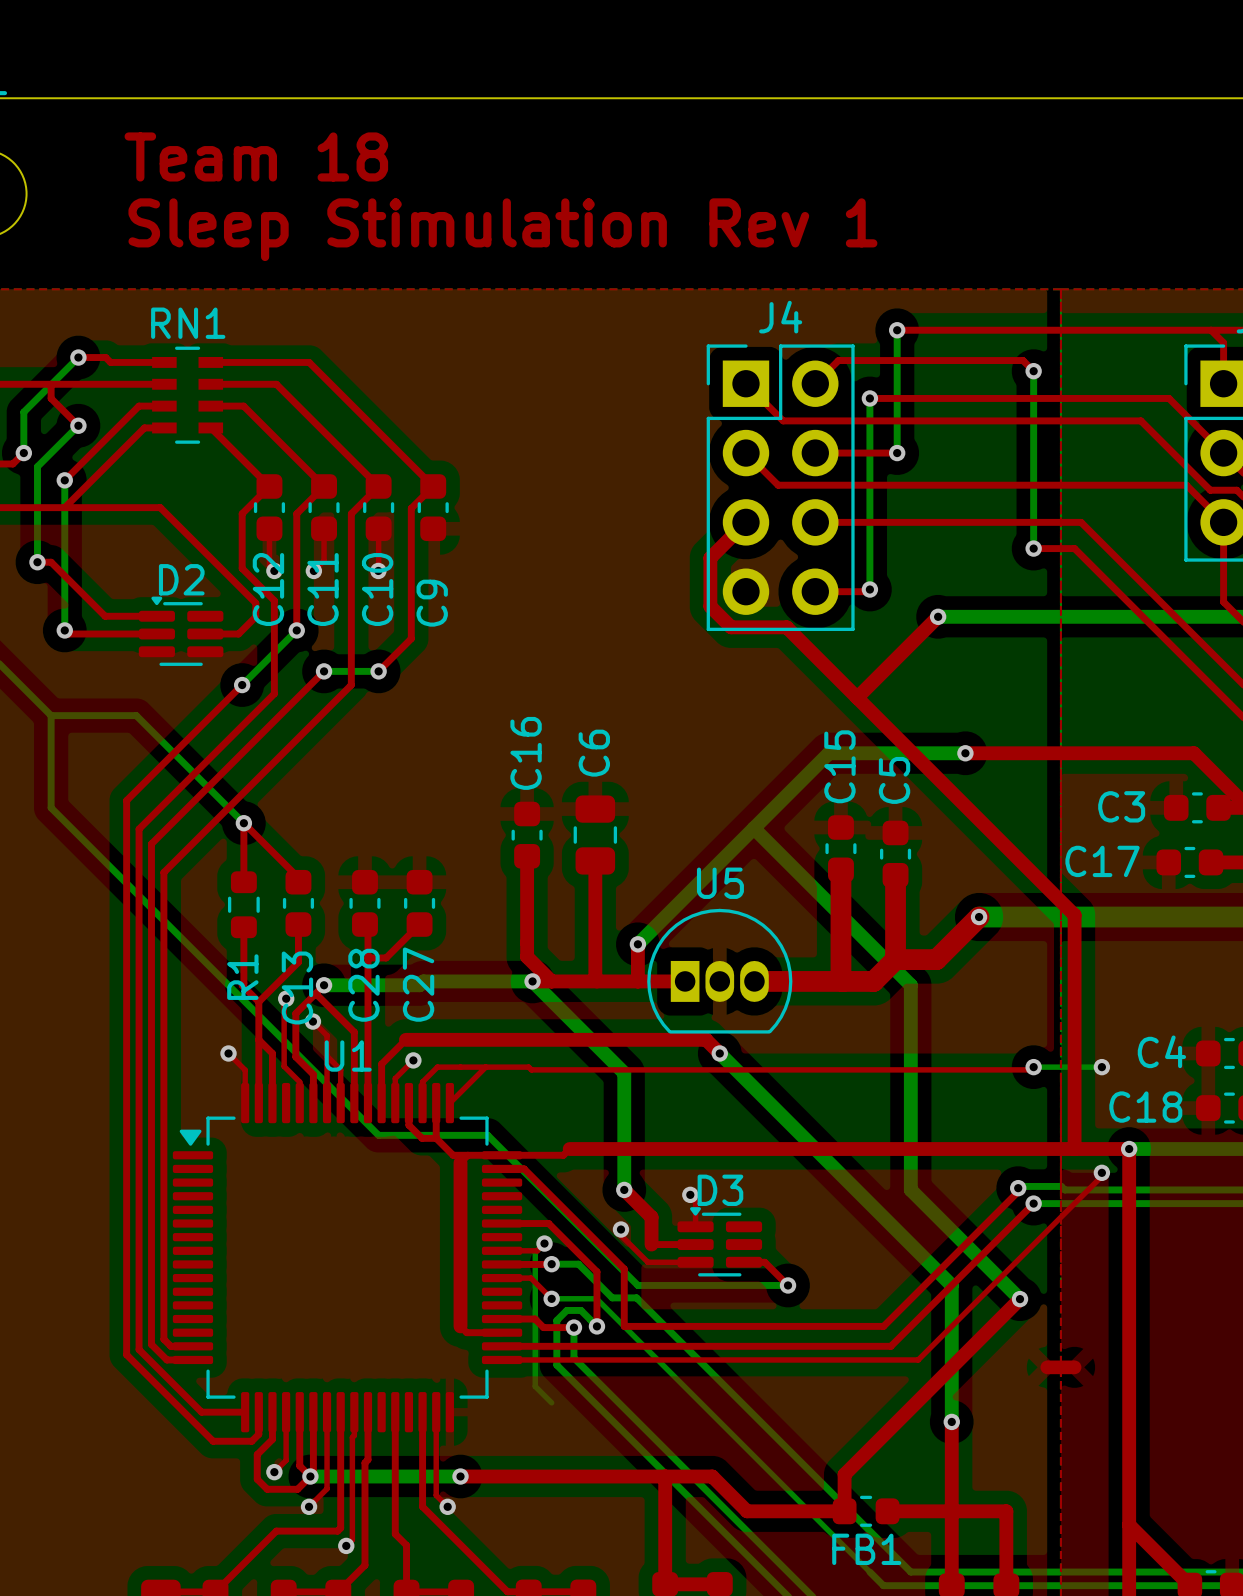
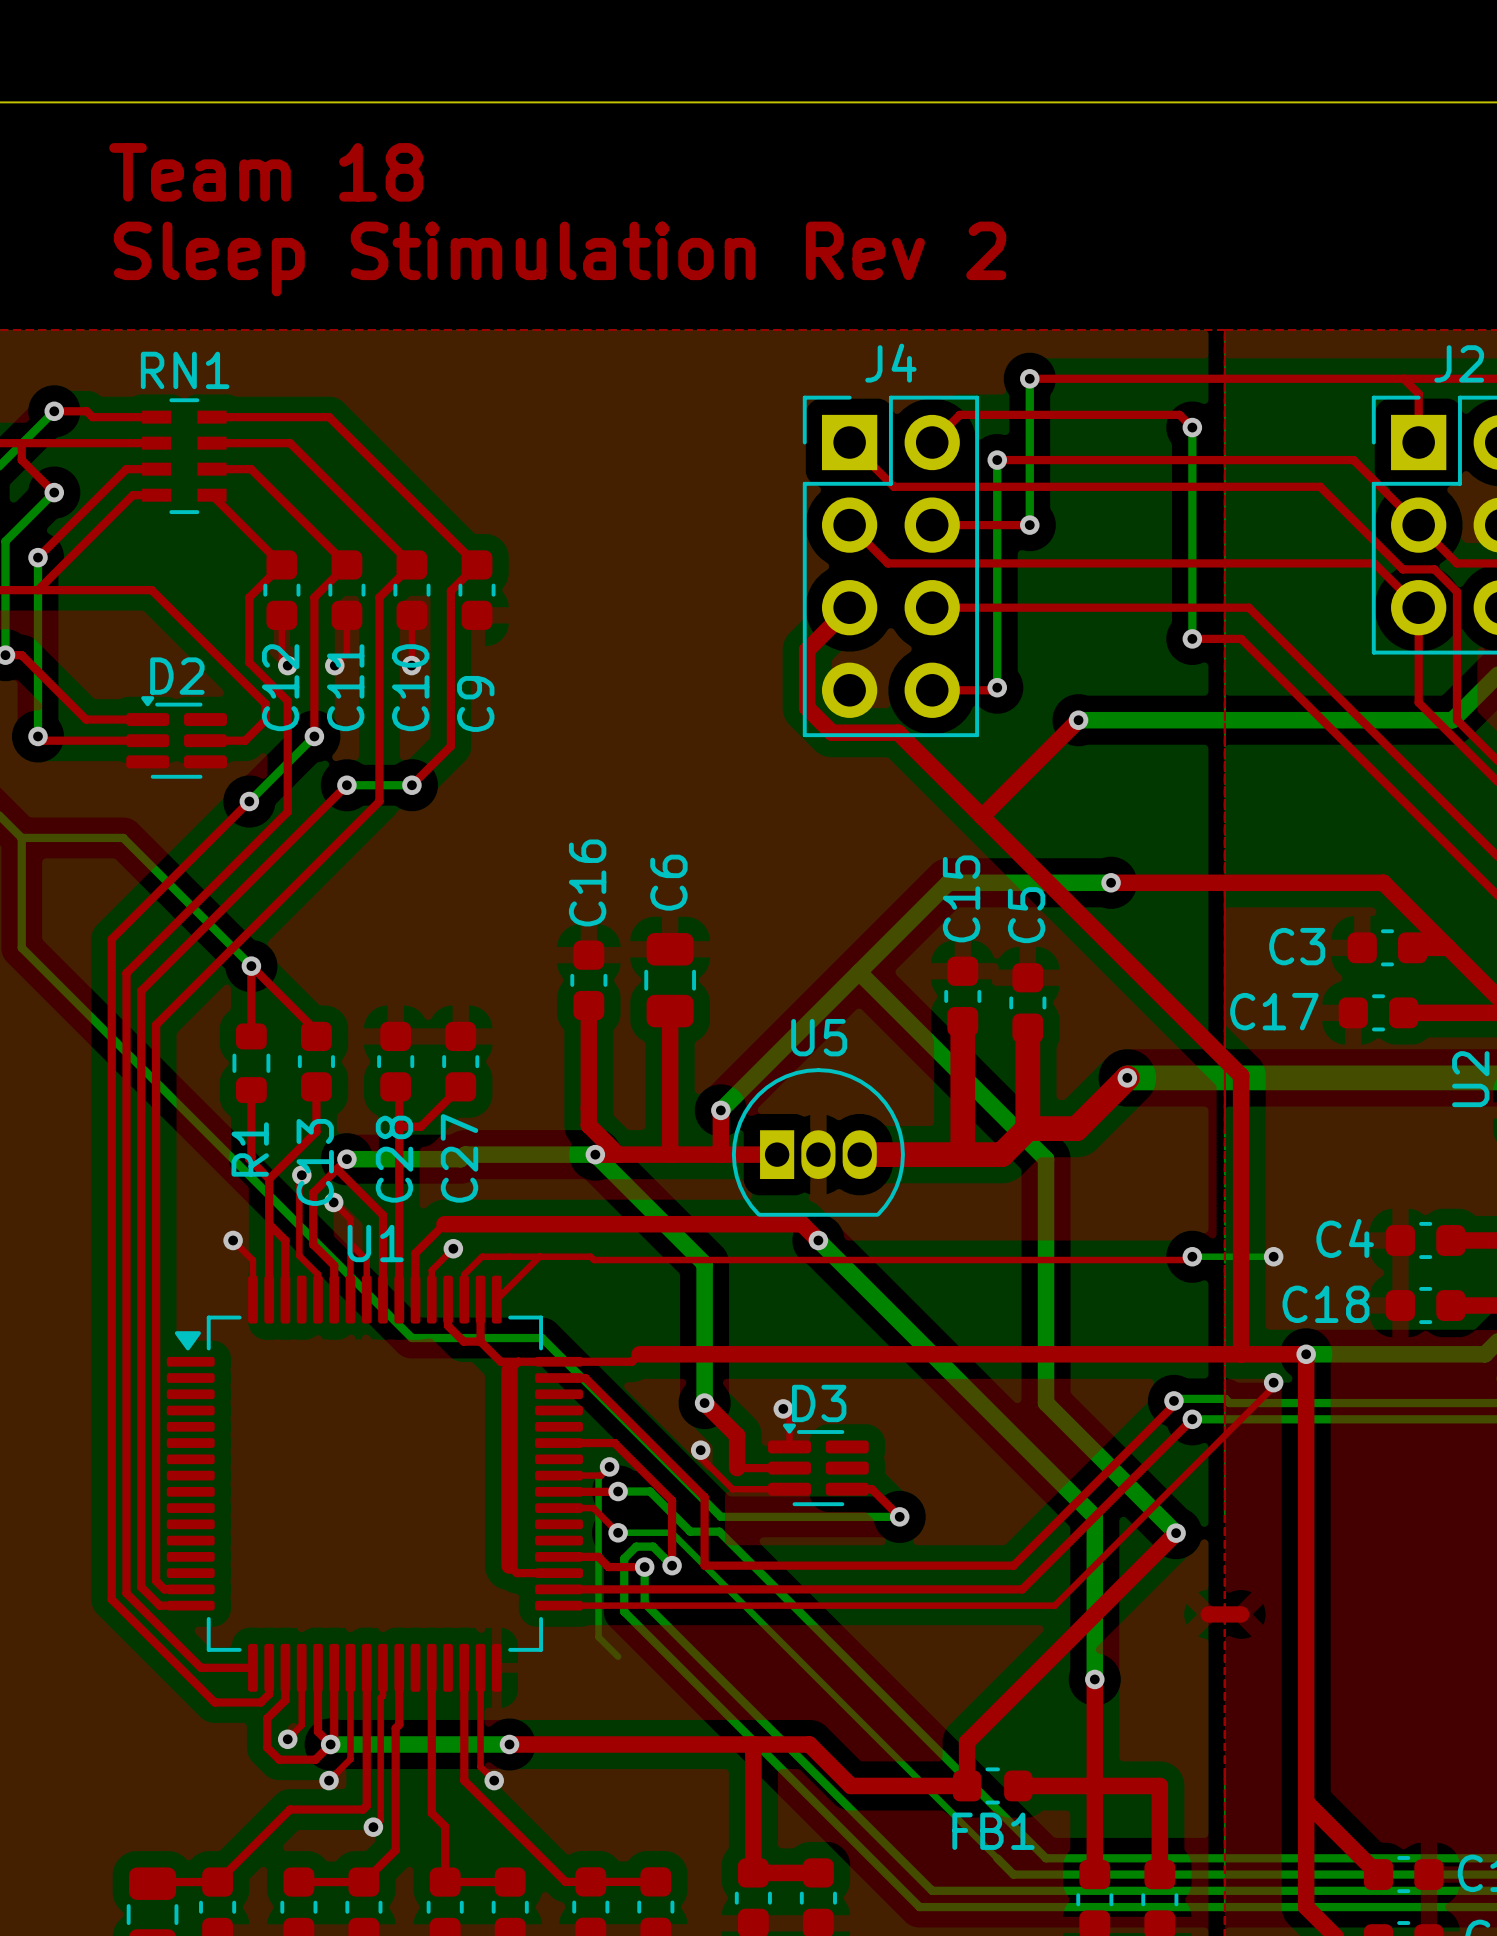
text: Sleep Stimulation Rev 1 (502, 229) -> Sleep Stimulation Rev 2 (560, 259)

